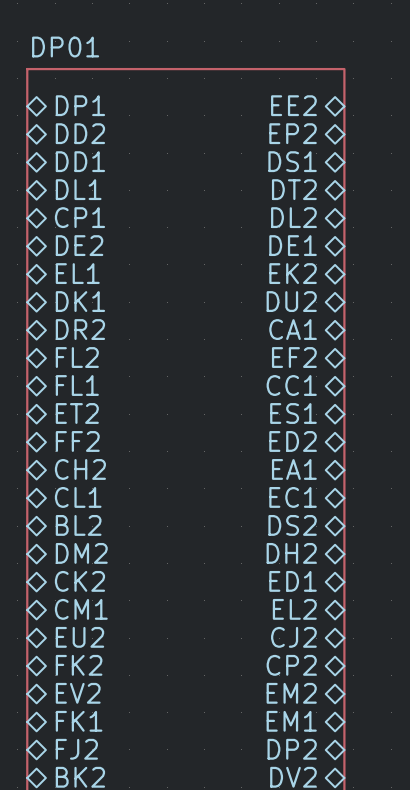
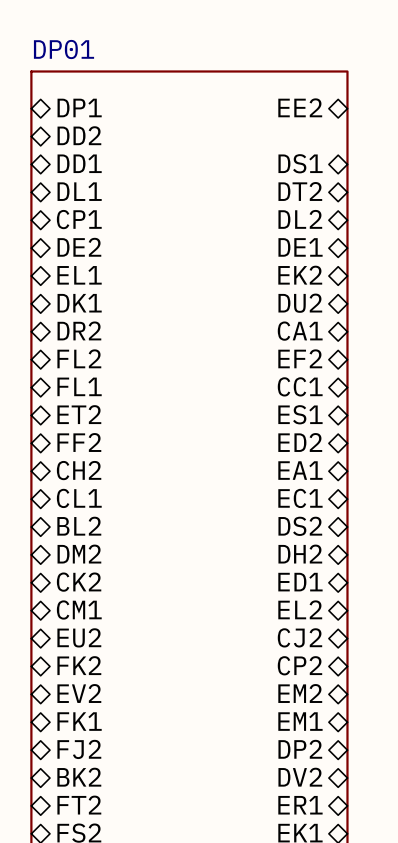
sheet pin: EP2 (293, 133) -> none

